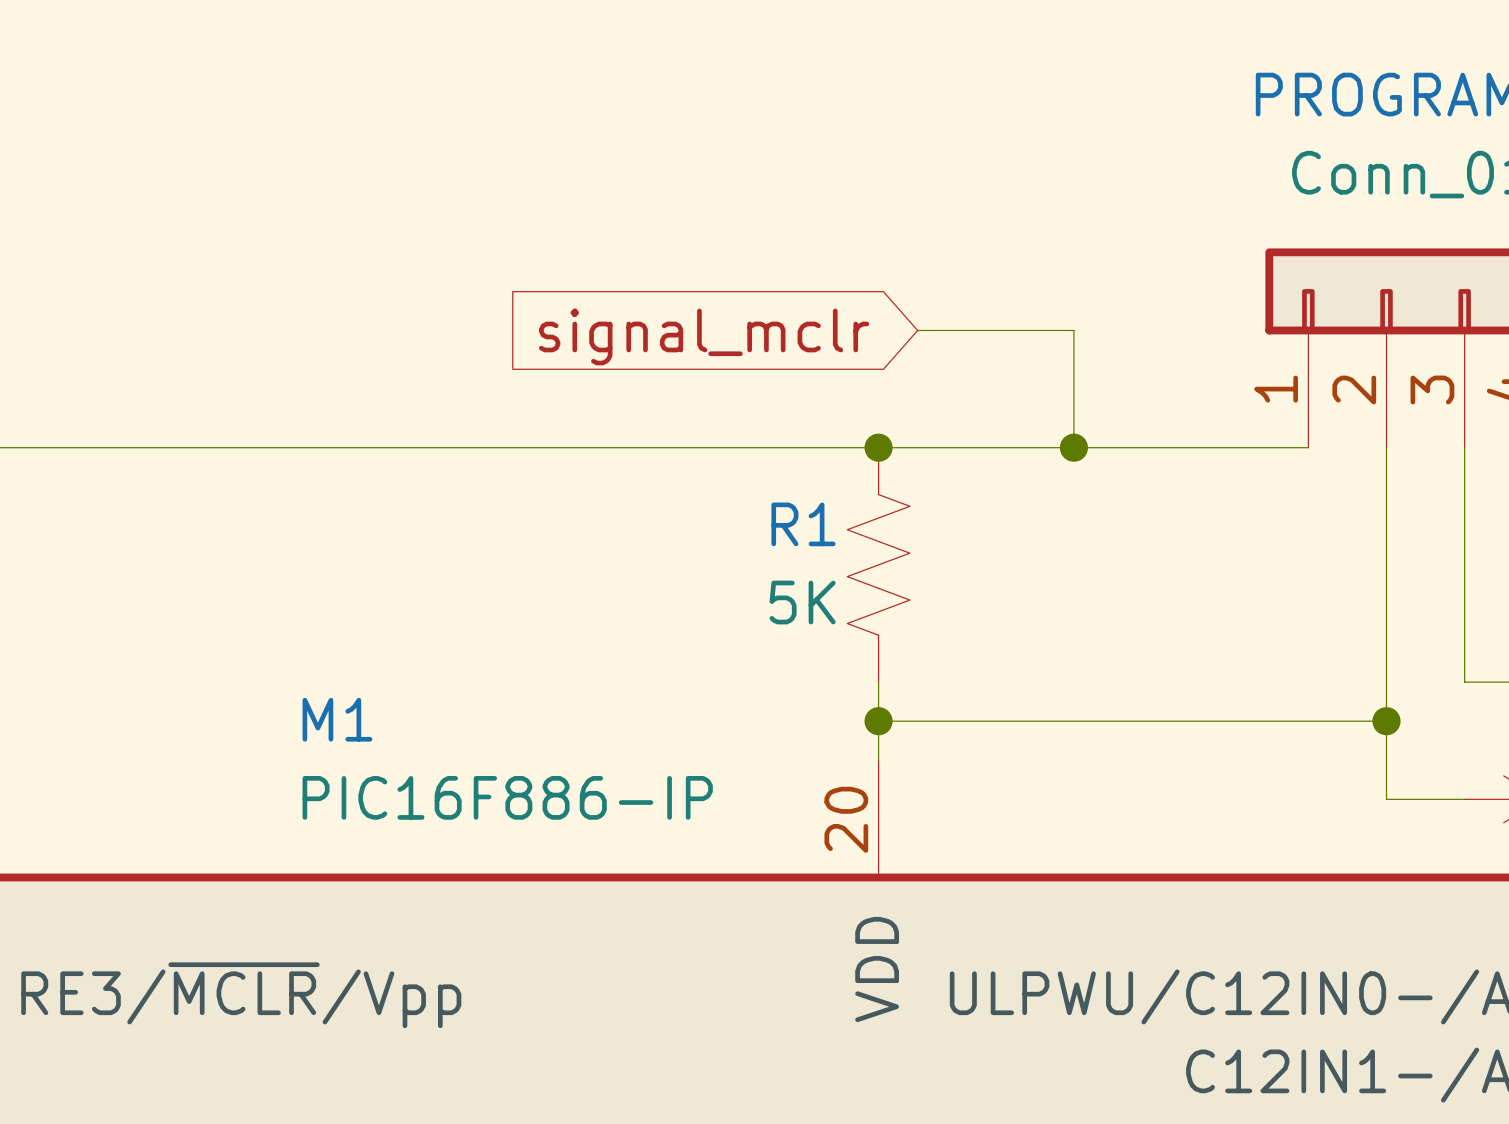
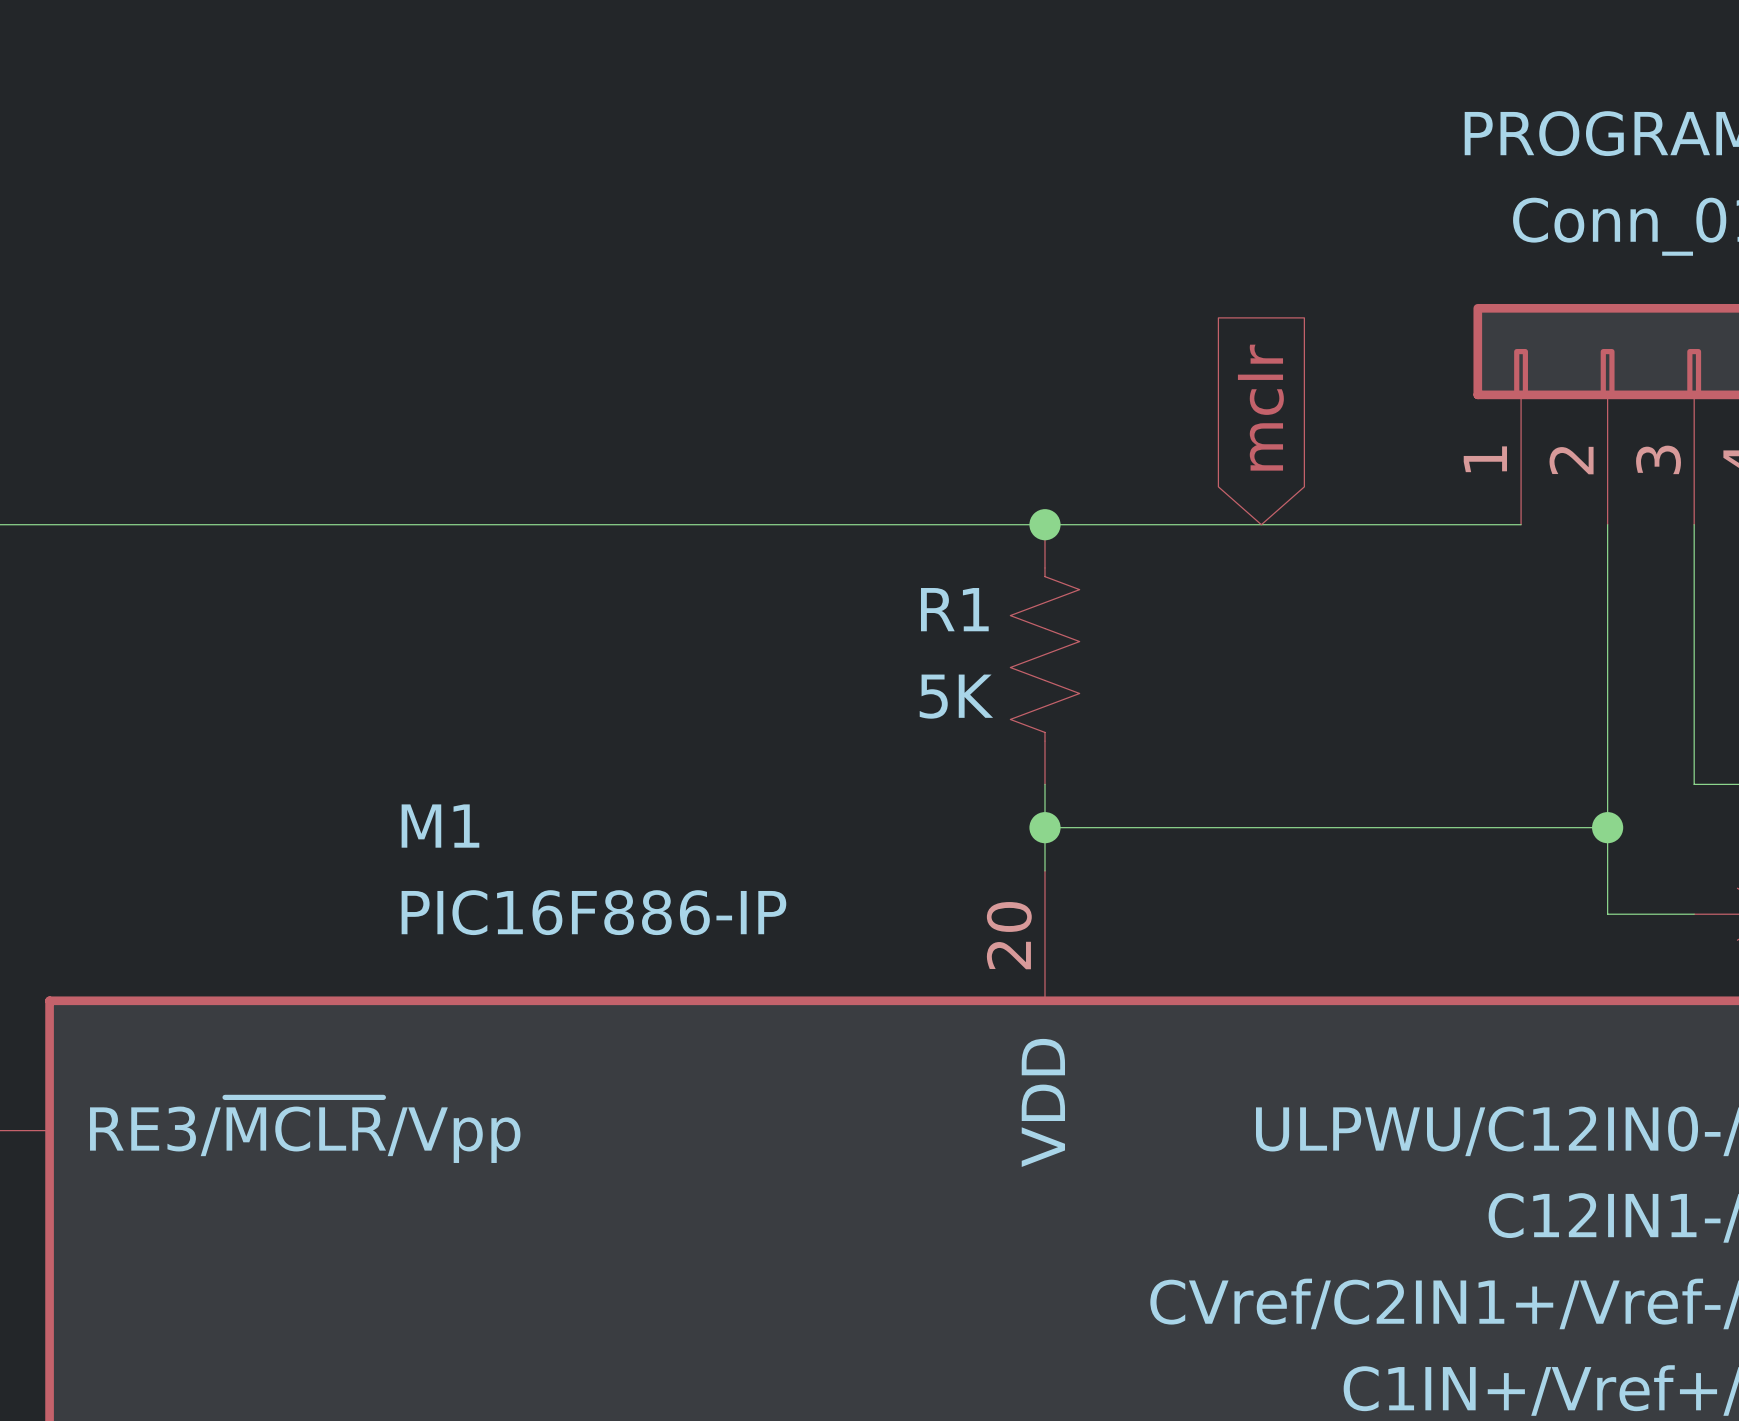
wire: (917, 330) (1073, 330) (1073, 447) -> none
global label: none -> mclr (1260, 407)
global label: signal_mclr (704, 336) -> none
junction: (1073, 447) -> none

